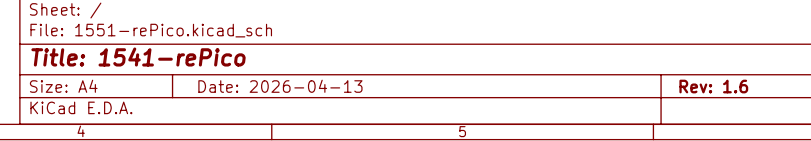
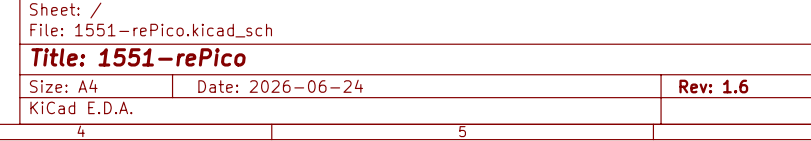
title block: Title: 1541-rePico (138, 57) -> Title: 1551-rePico (138, 57)
title block: Date: 2026-04-13 (280, 86) -> Date: 2026-06-24 (280, 86)

